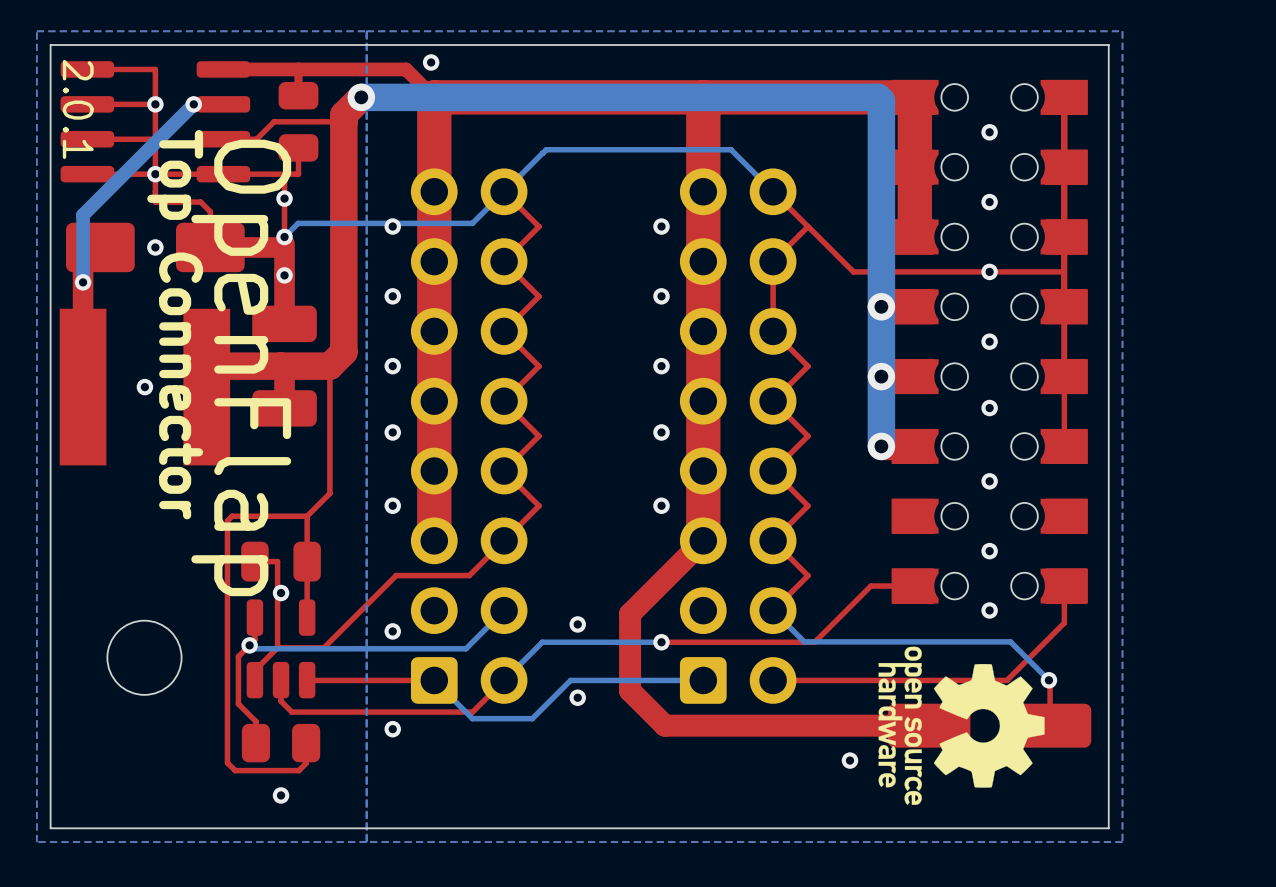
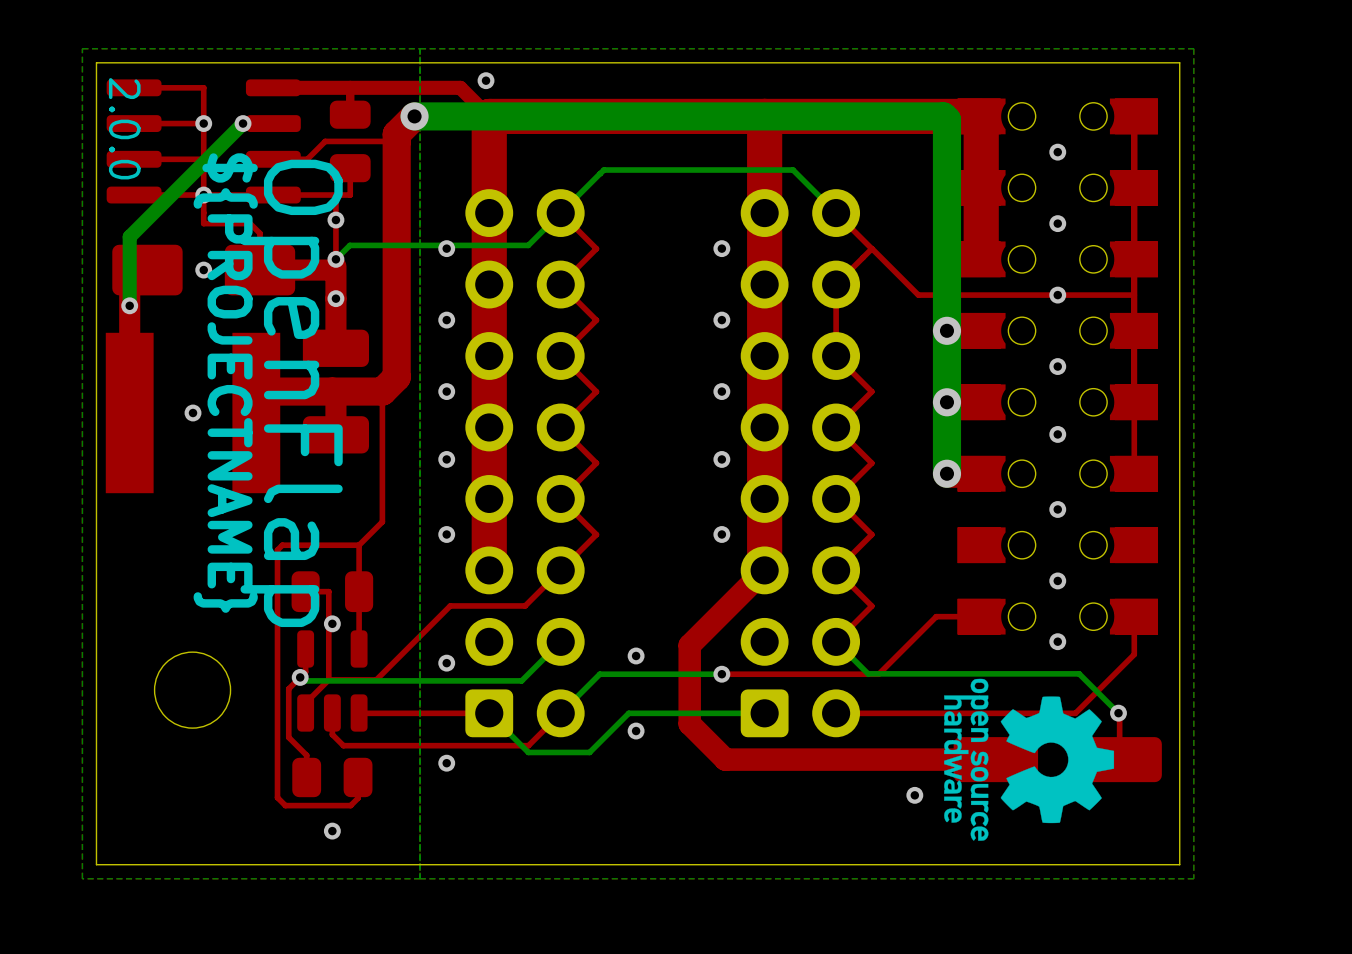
text: 2.0.1 (78, 109) -> 2.0.0 (124, 128)
text: Top Connector (175, 324) -> ${PROJECTNAME} (225, 383)

